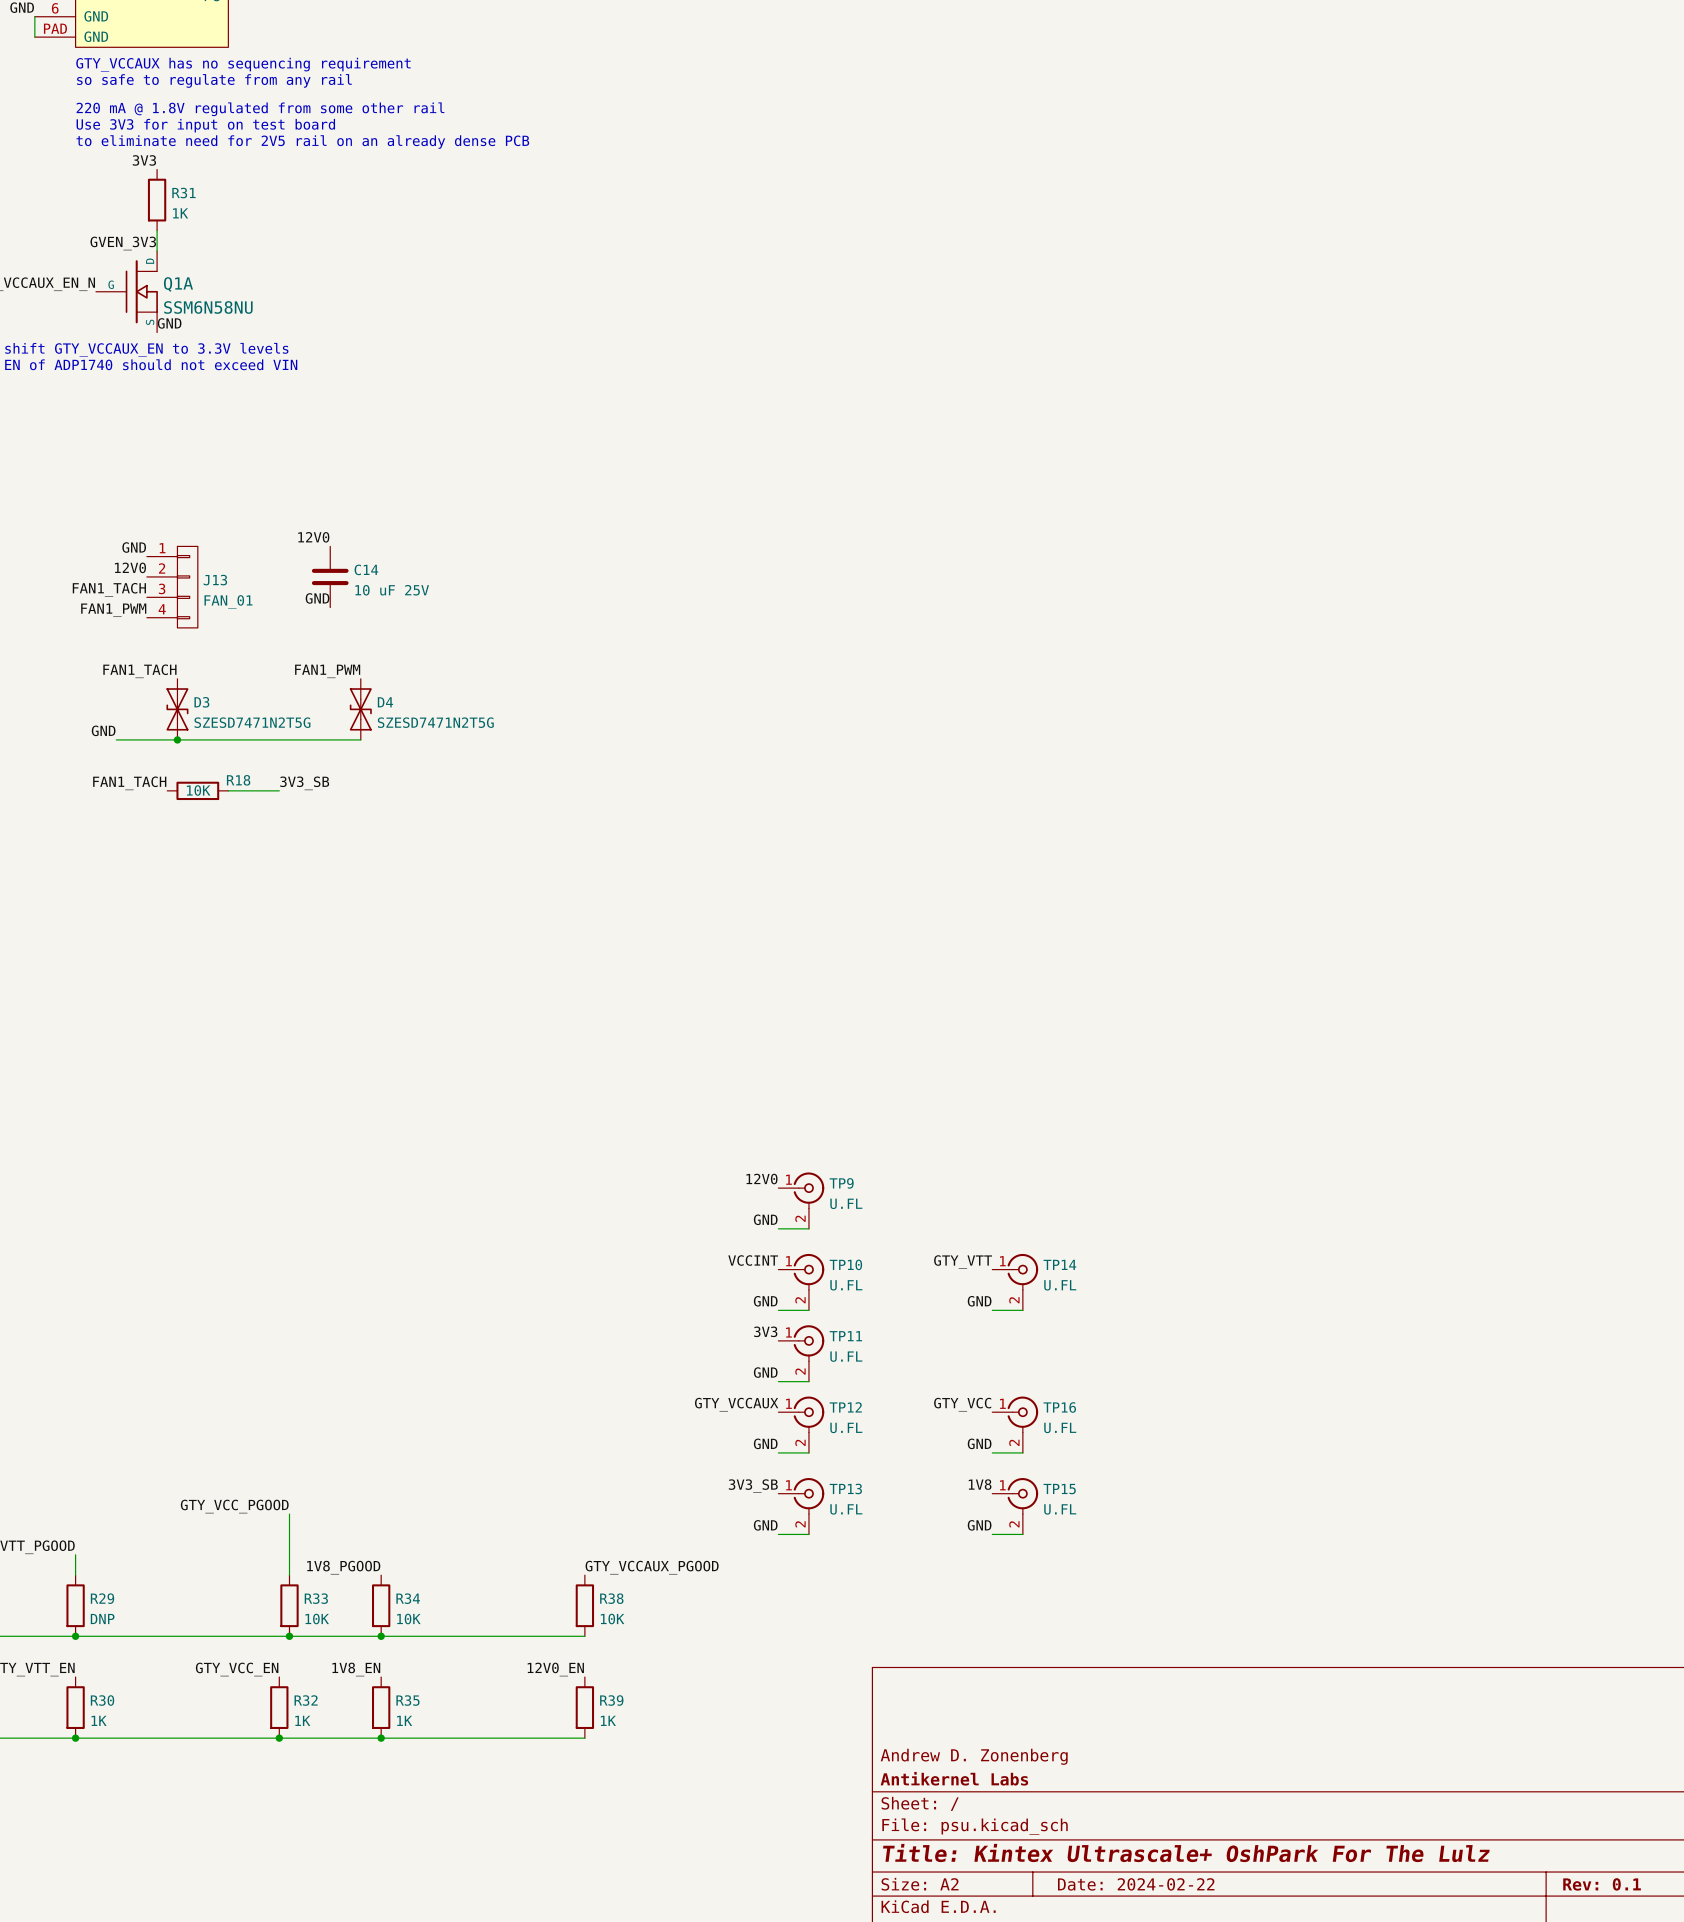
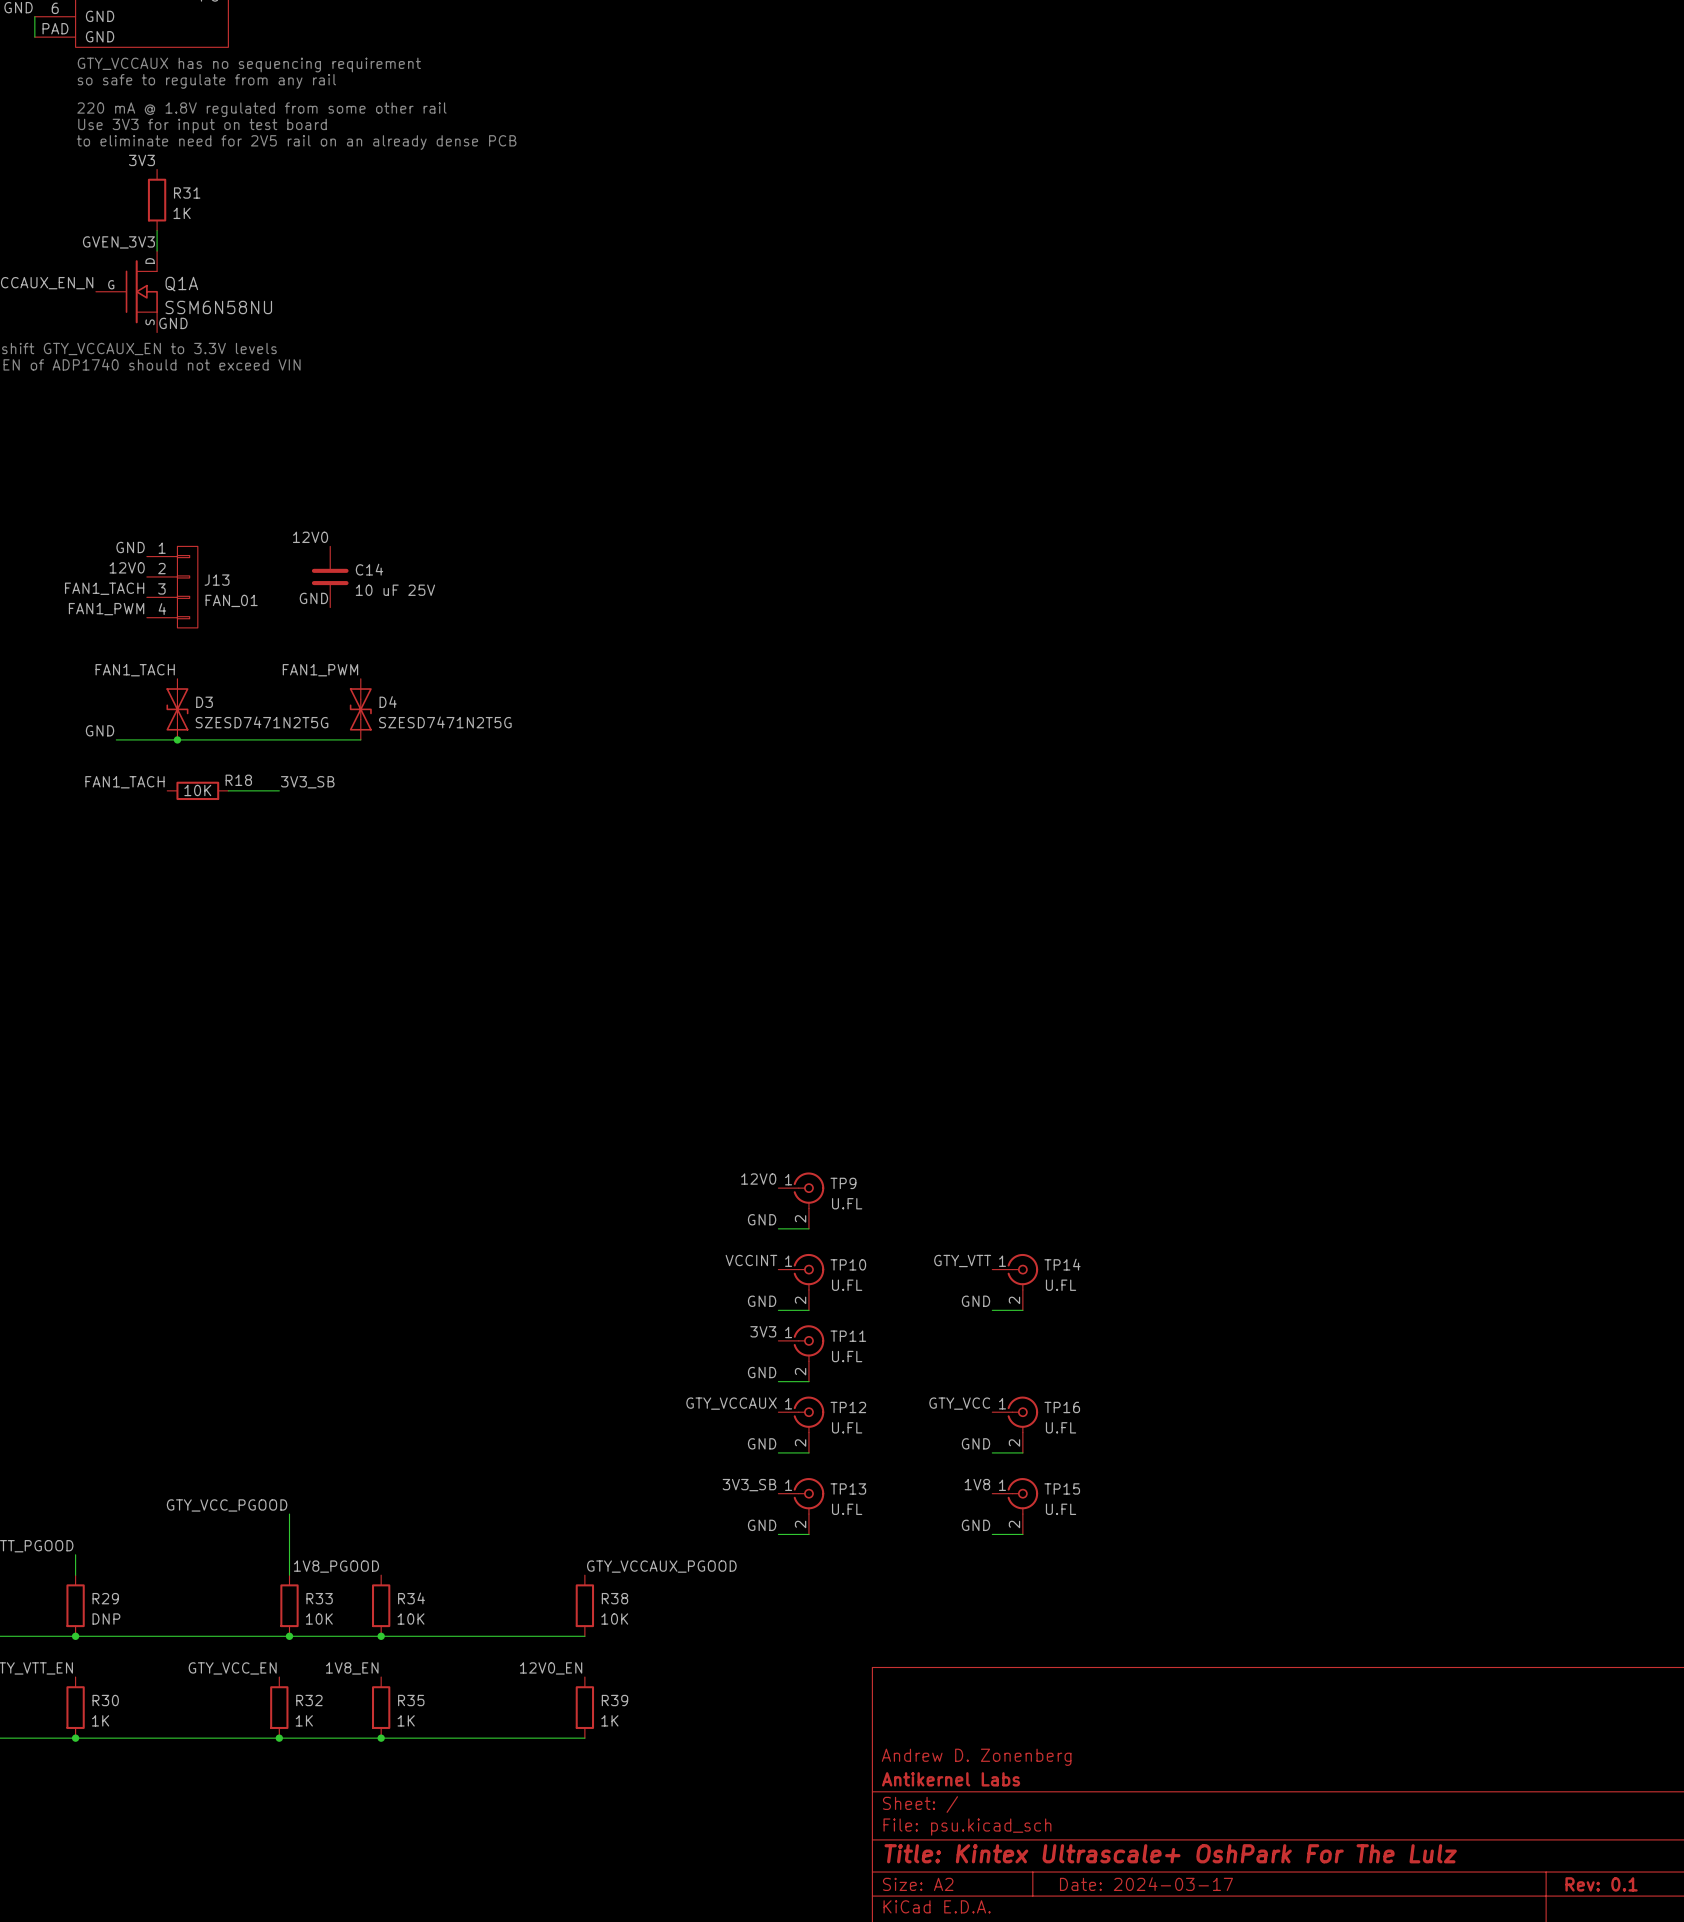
title block: Date: 2024-02-22 (1136, 1884) -> Date: 2024-03-17 (1146, 1884)

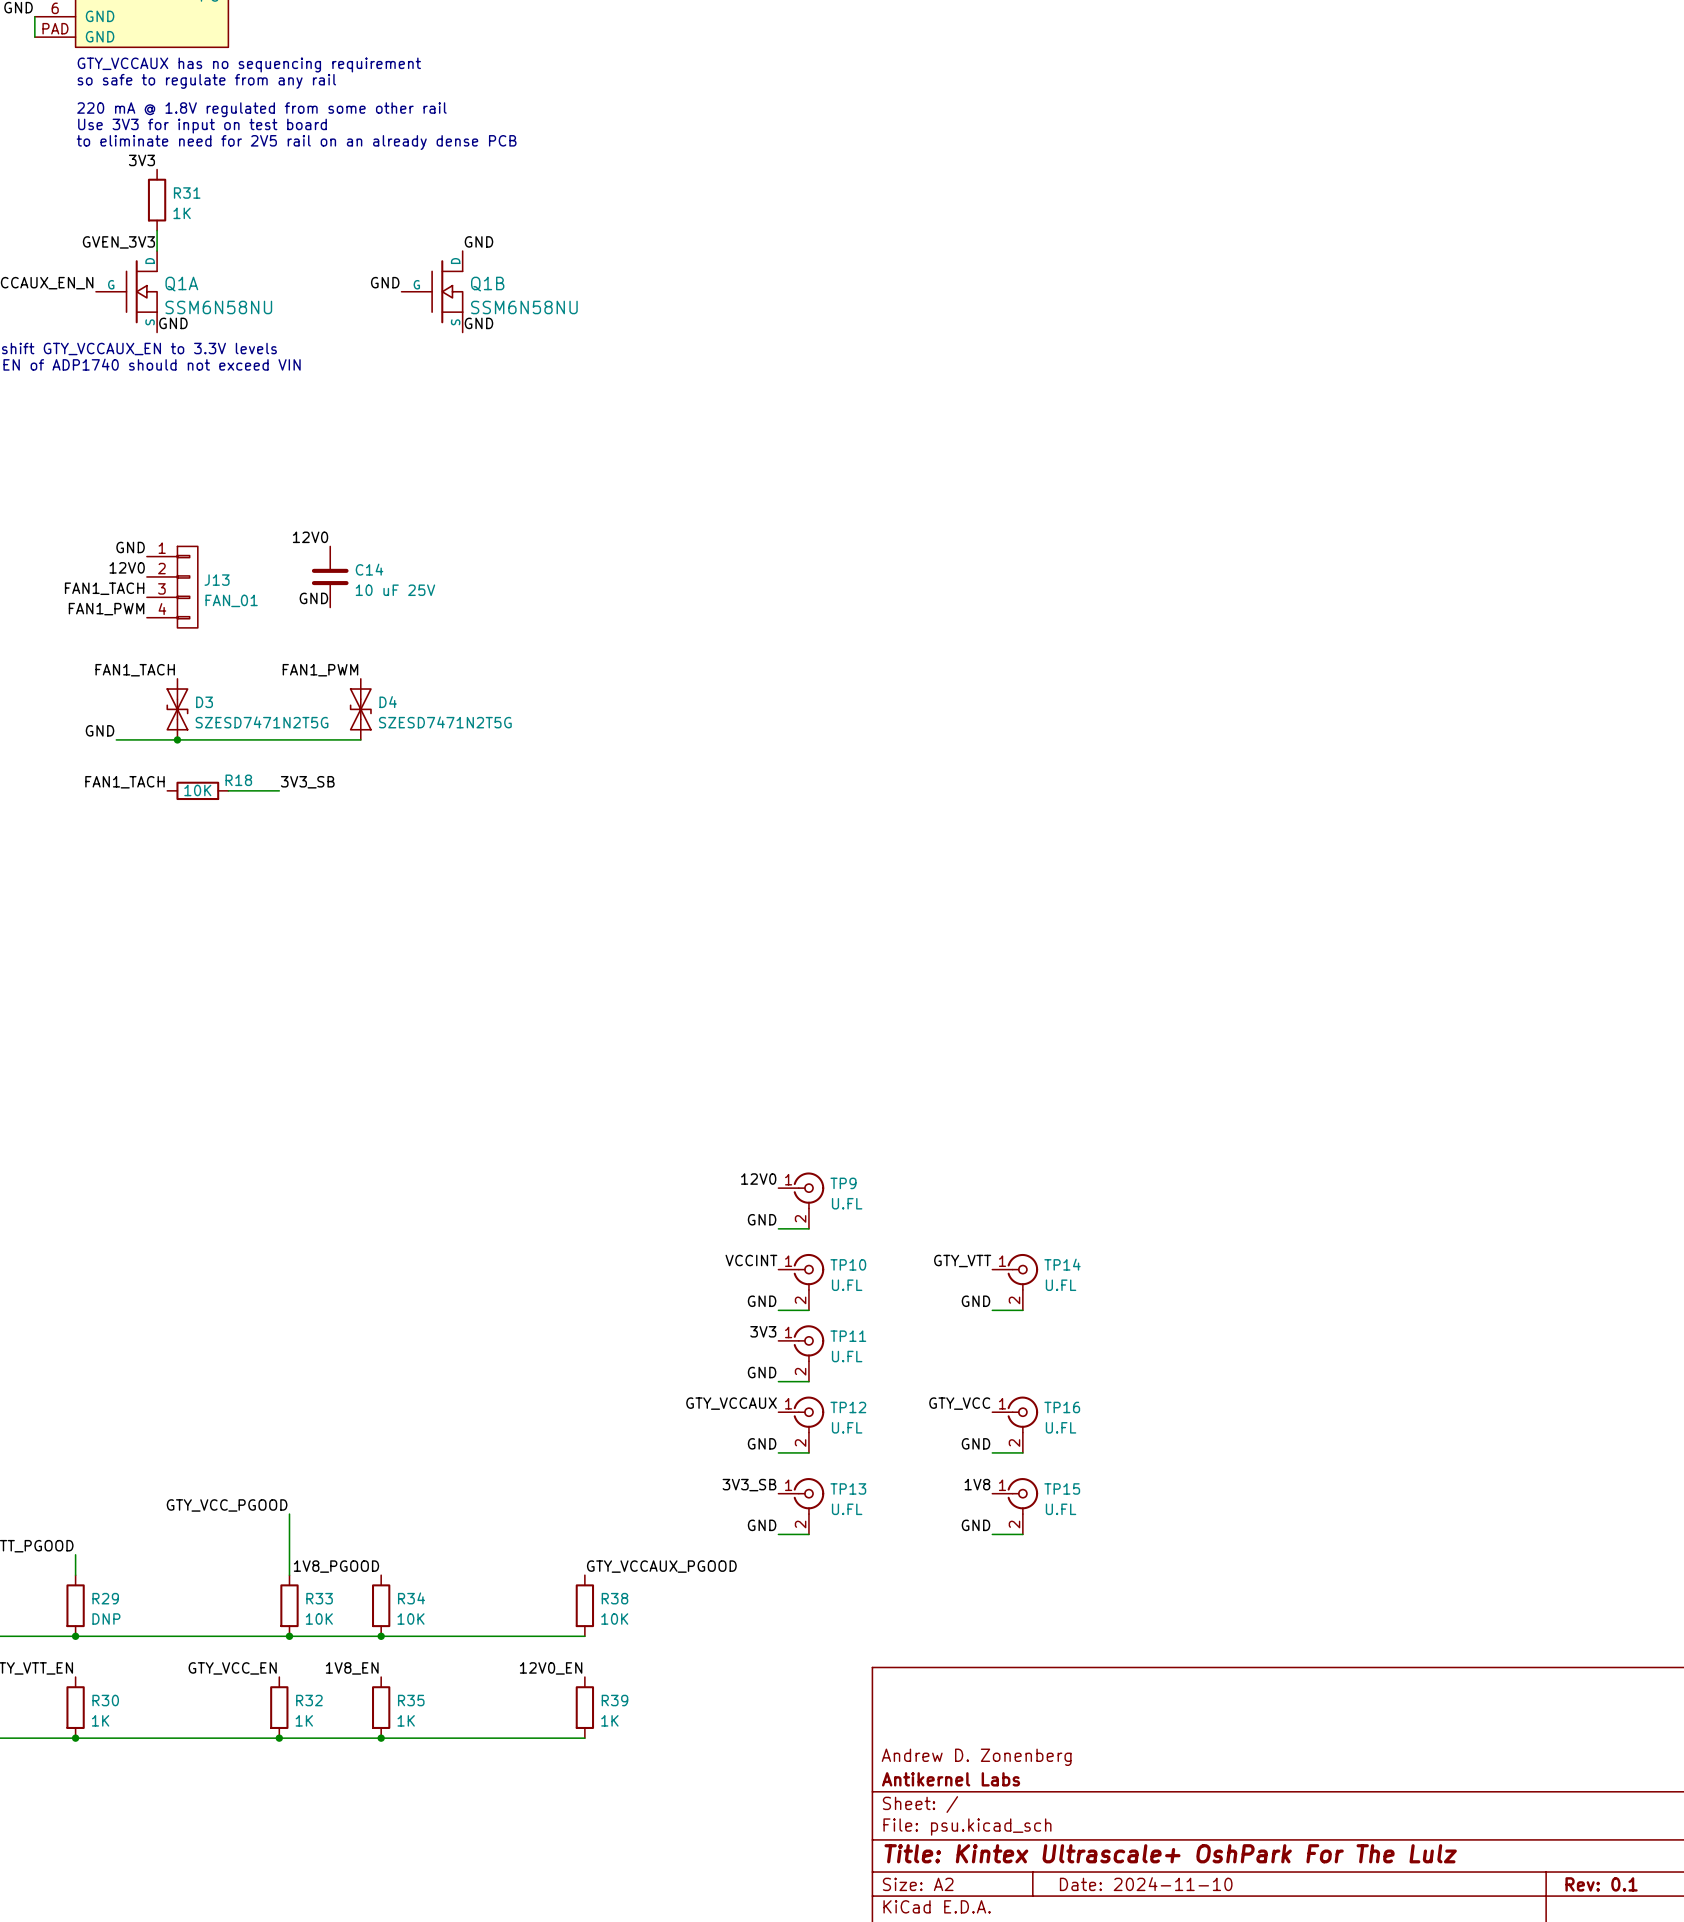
label: none -> GND (478, 241)
label: none -> GND (385, 282)
Q1B: none -> SSM6N58NU (432, 291)
label: none -> GND (478, 323)
title block: Date: 2024-03-17 (1146, 1884) -> Date: 2024-11-10 (1146, 1884)

